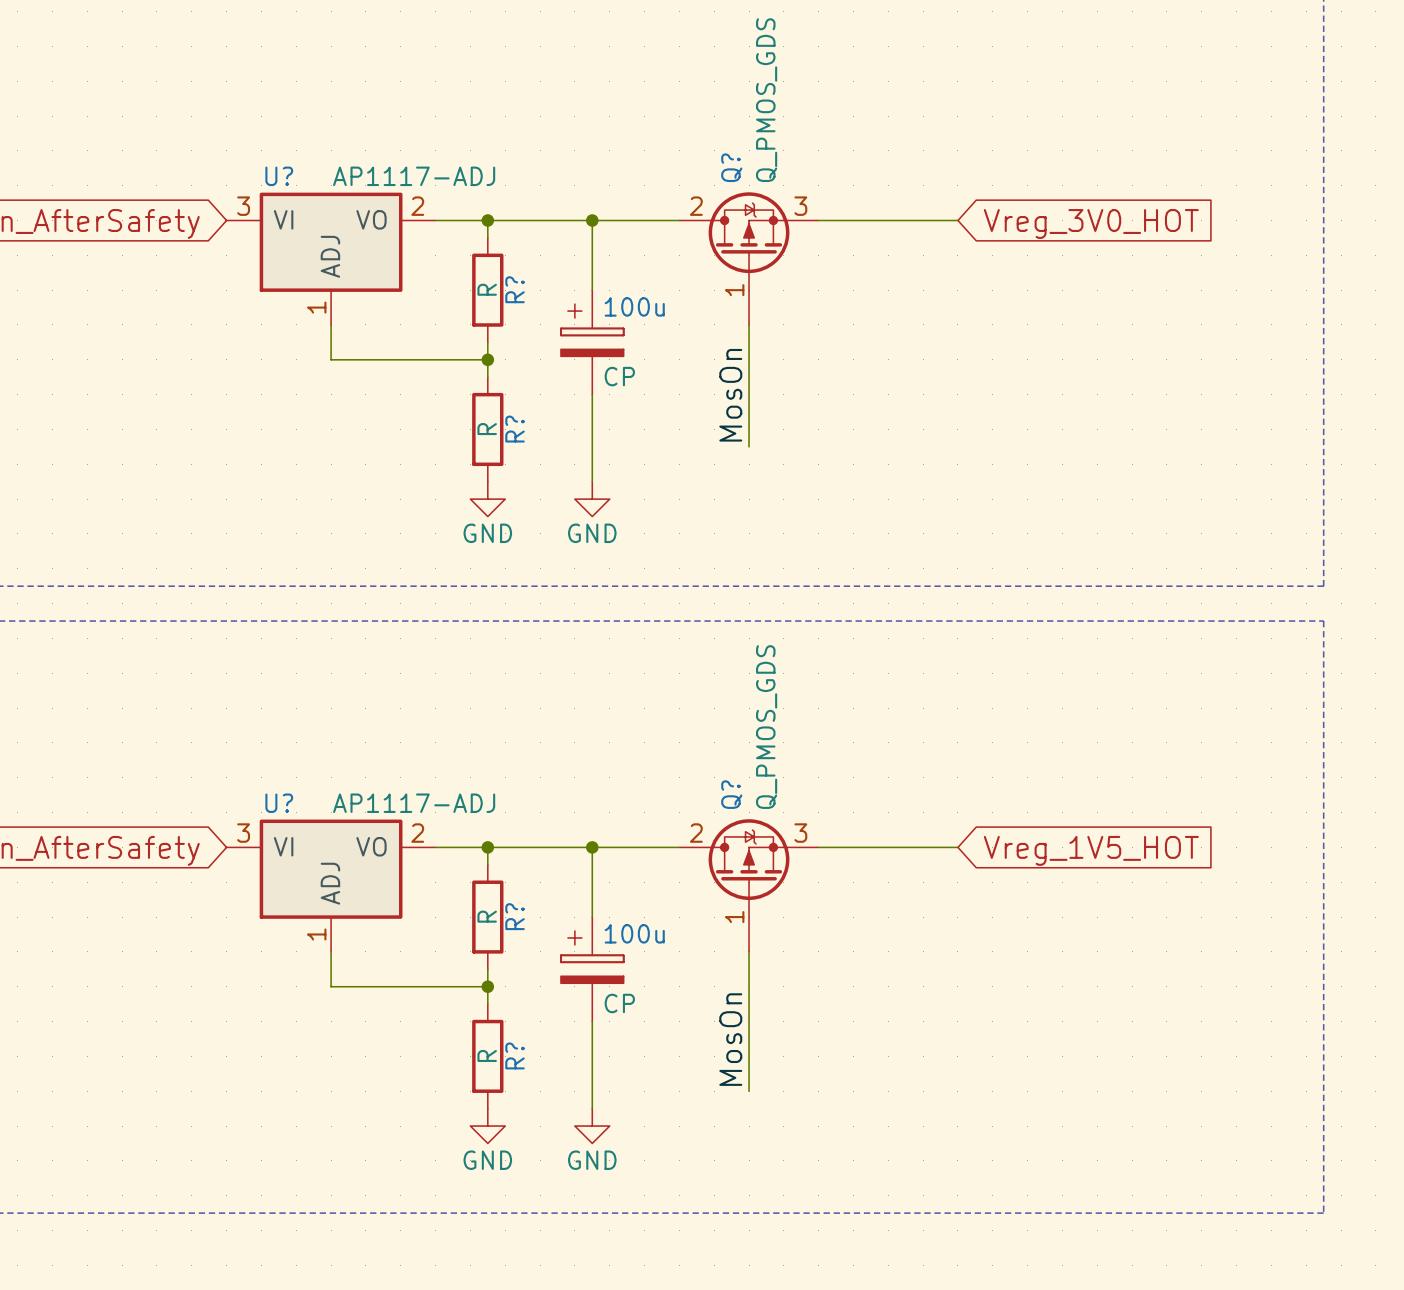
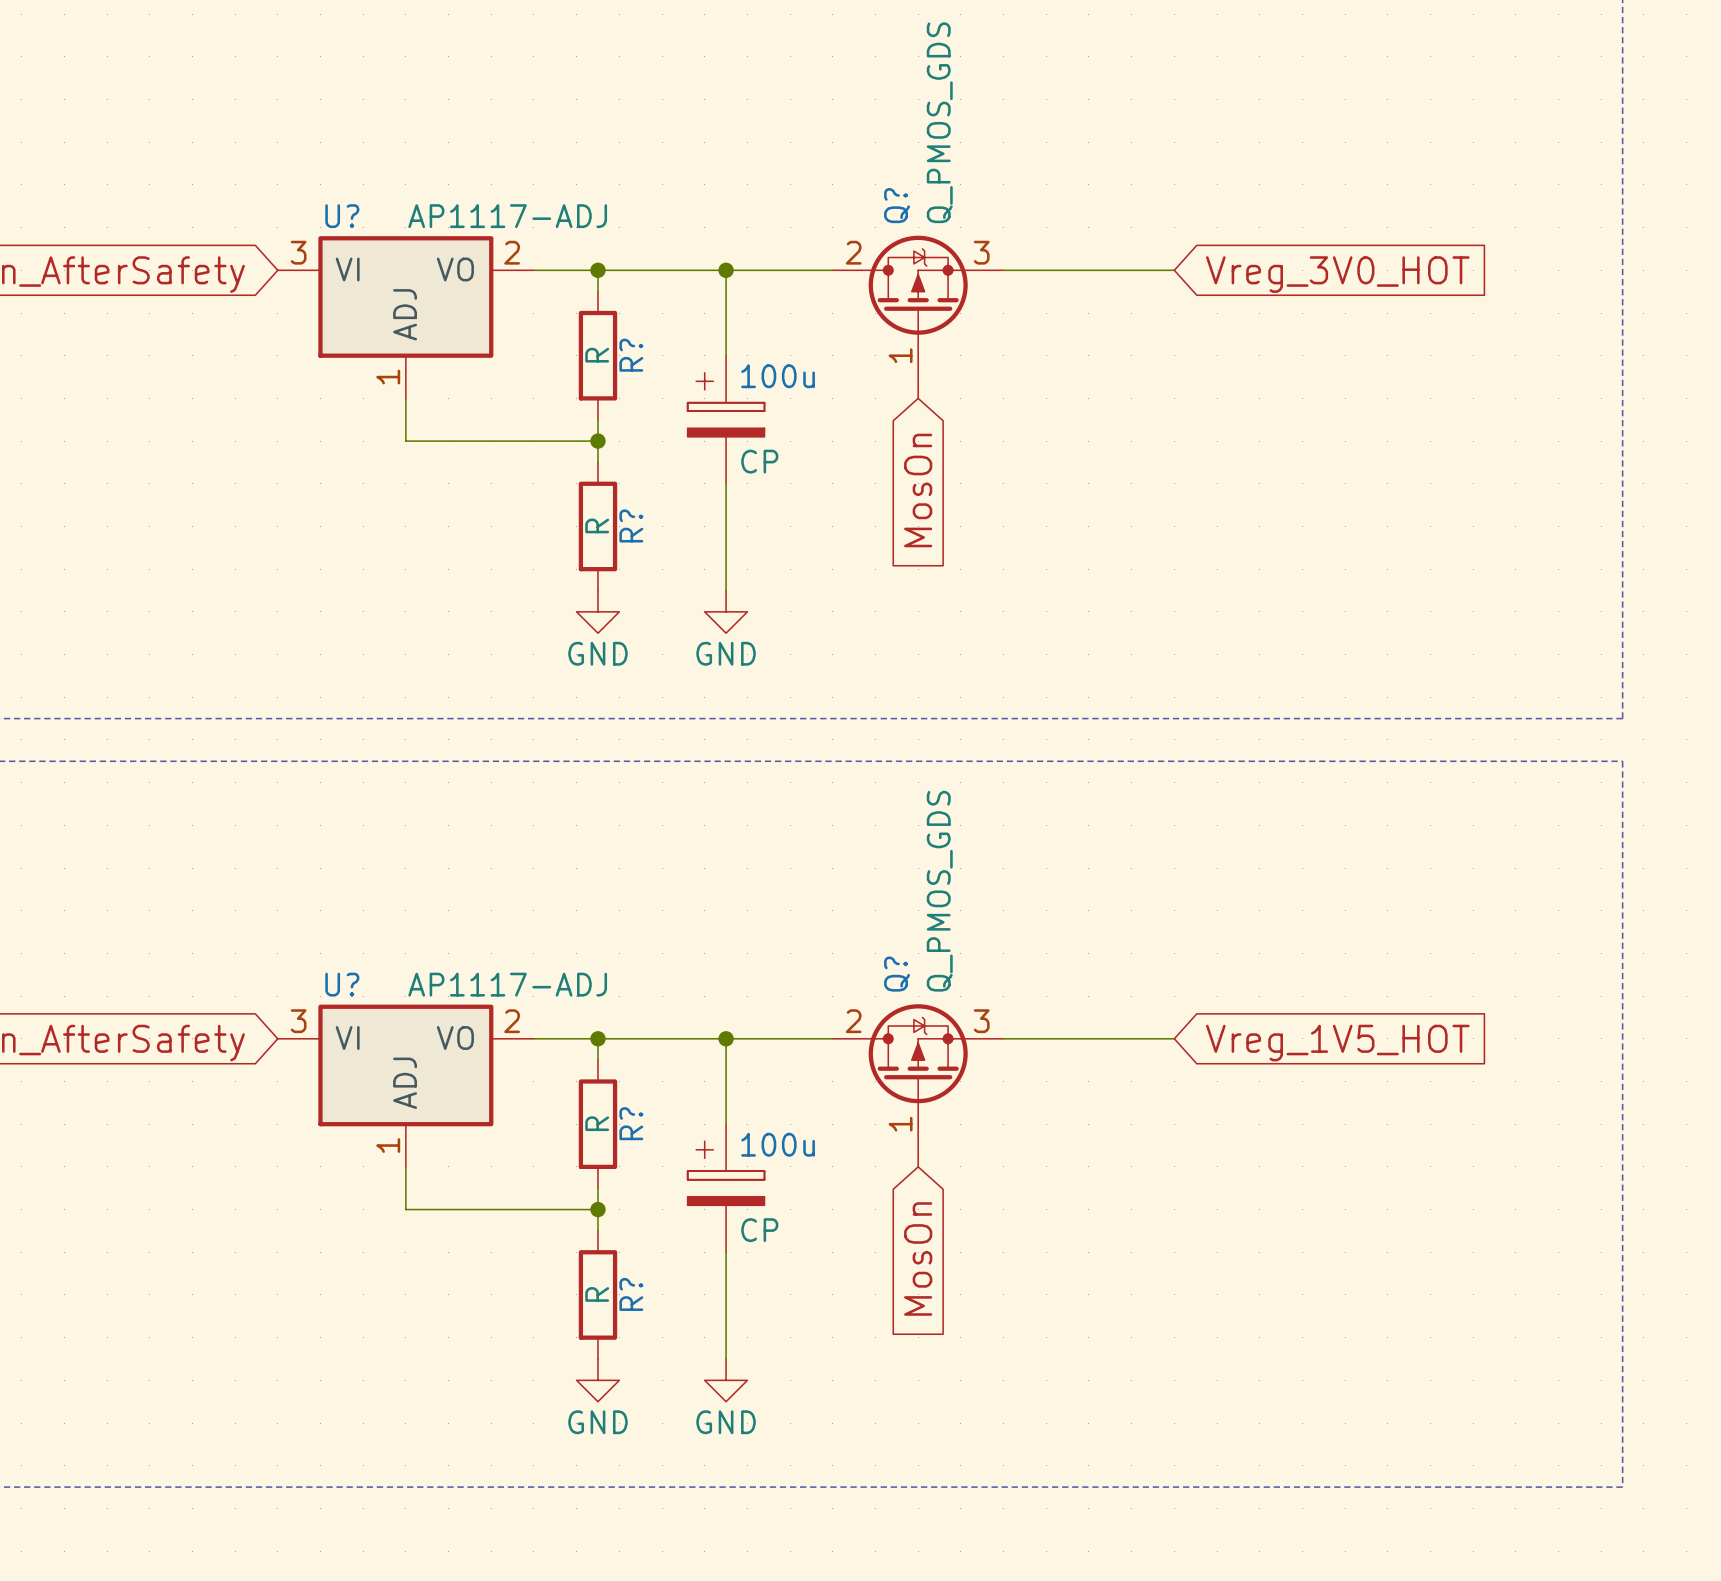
wire: (749, 324) (749, 446) -> none
label: MosOn (730, 395) -> none
global label: none -> MosOn (918, 490)
wire: (749, 951) (749, 1091) -> none
global label: none -> MosOn (918, 1258)
label: MosOn (730, 1039) -> none

